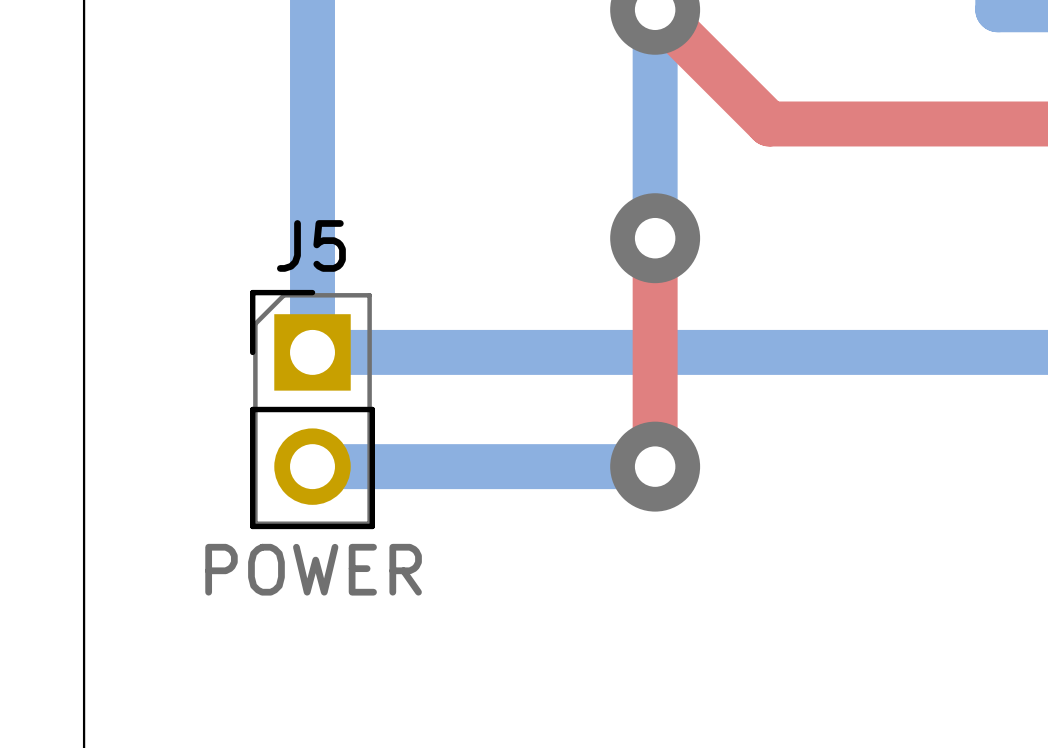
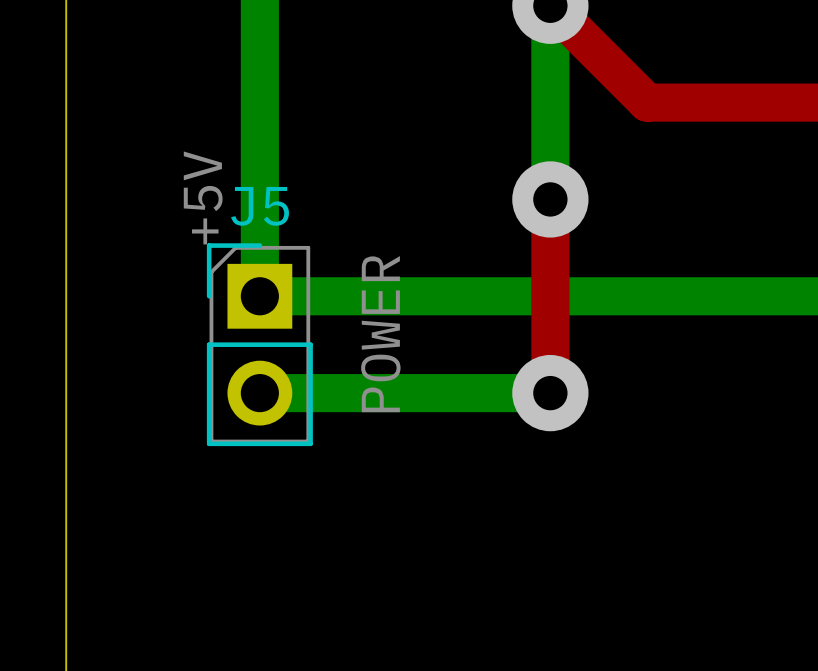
text: none -> +5V (203, 197)
J5 value rotation: 0° (313, 569) -> 90° counterclockwise (380, 334)

